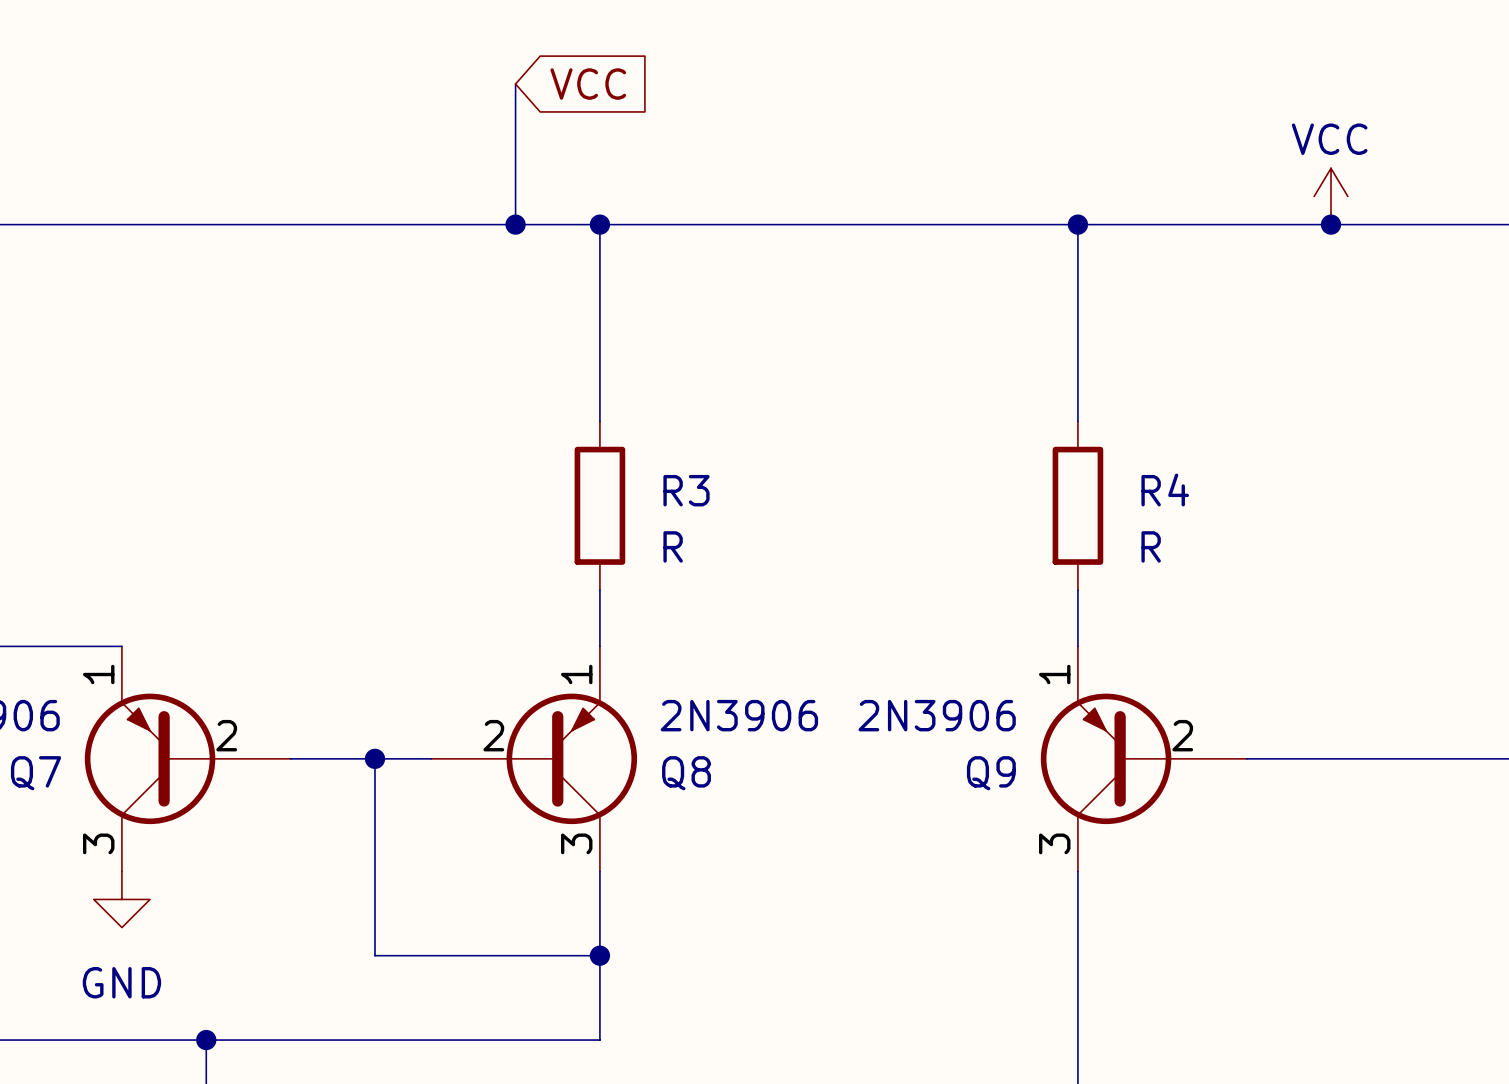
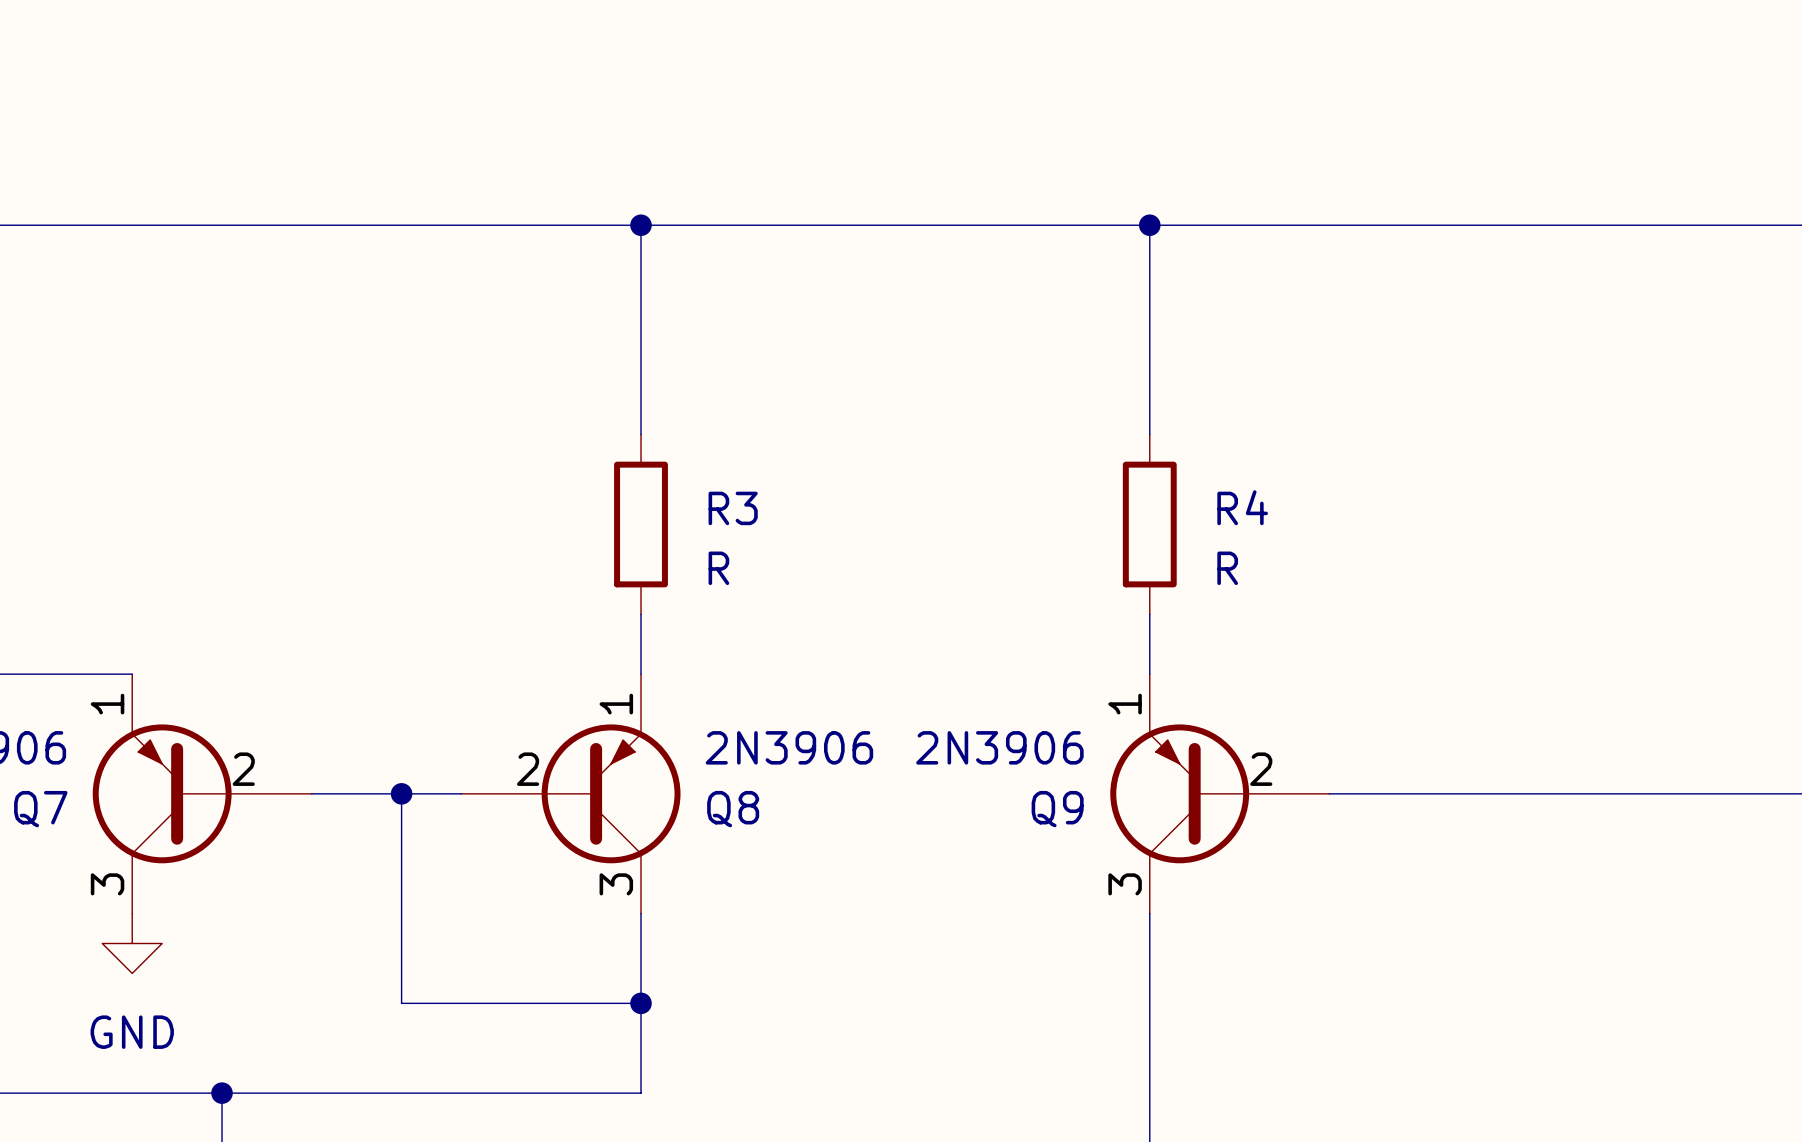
wire: (515, 84) (515, 224) -> none
global label: VCC (588, 84) -> none
power symbol: VCC (1331, 196) -> none
junction: (515, 224) -> none
junction: (1331, 224) -> none

